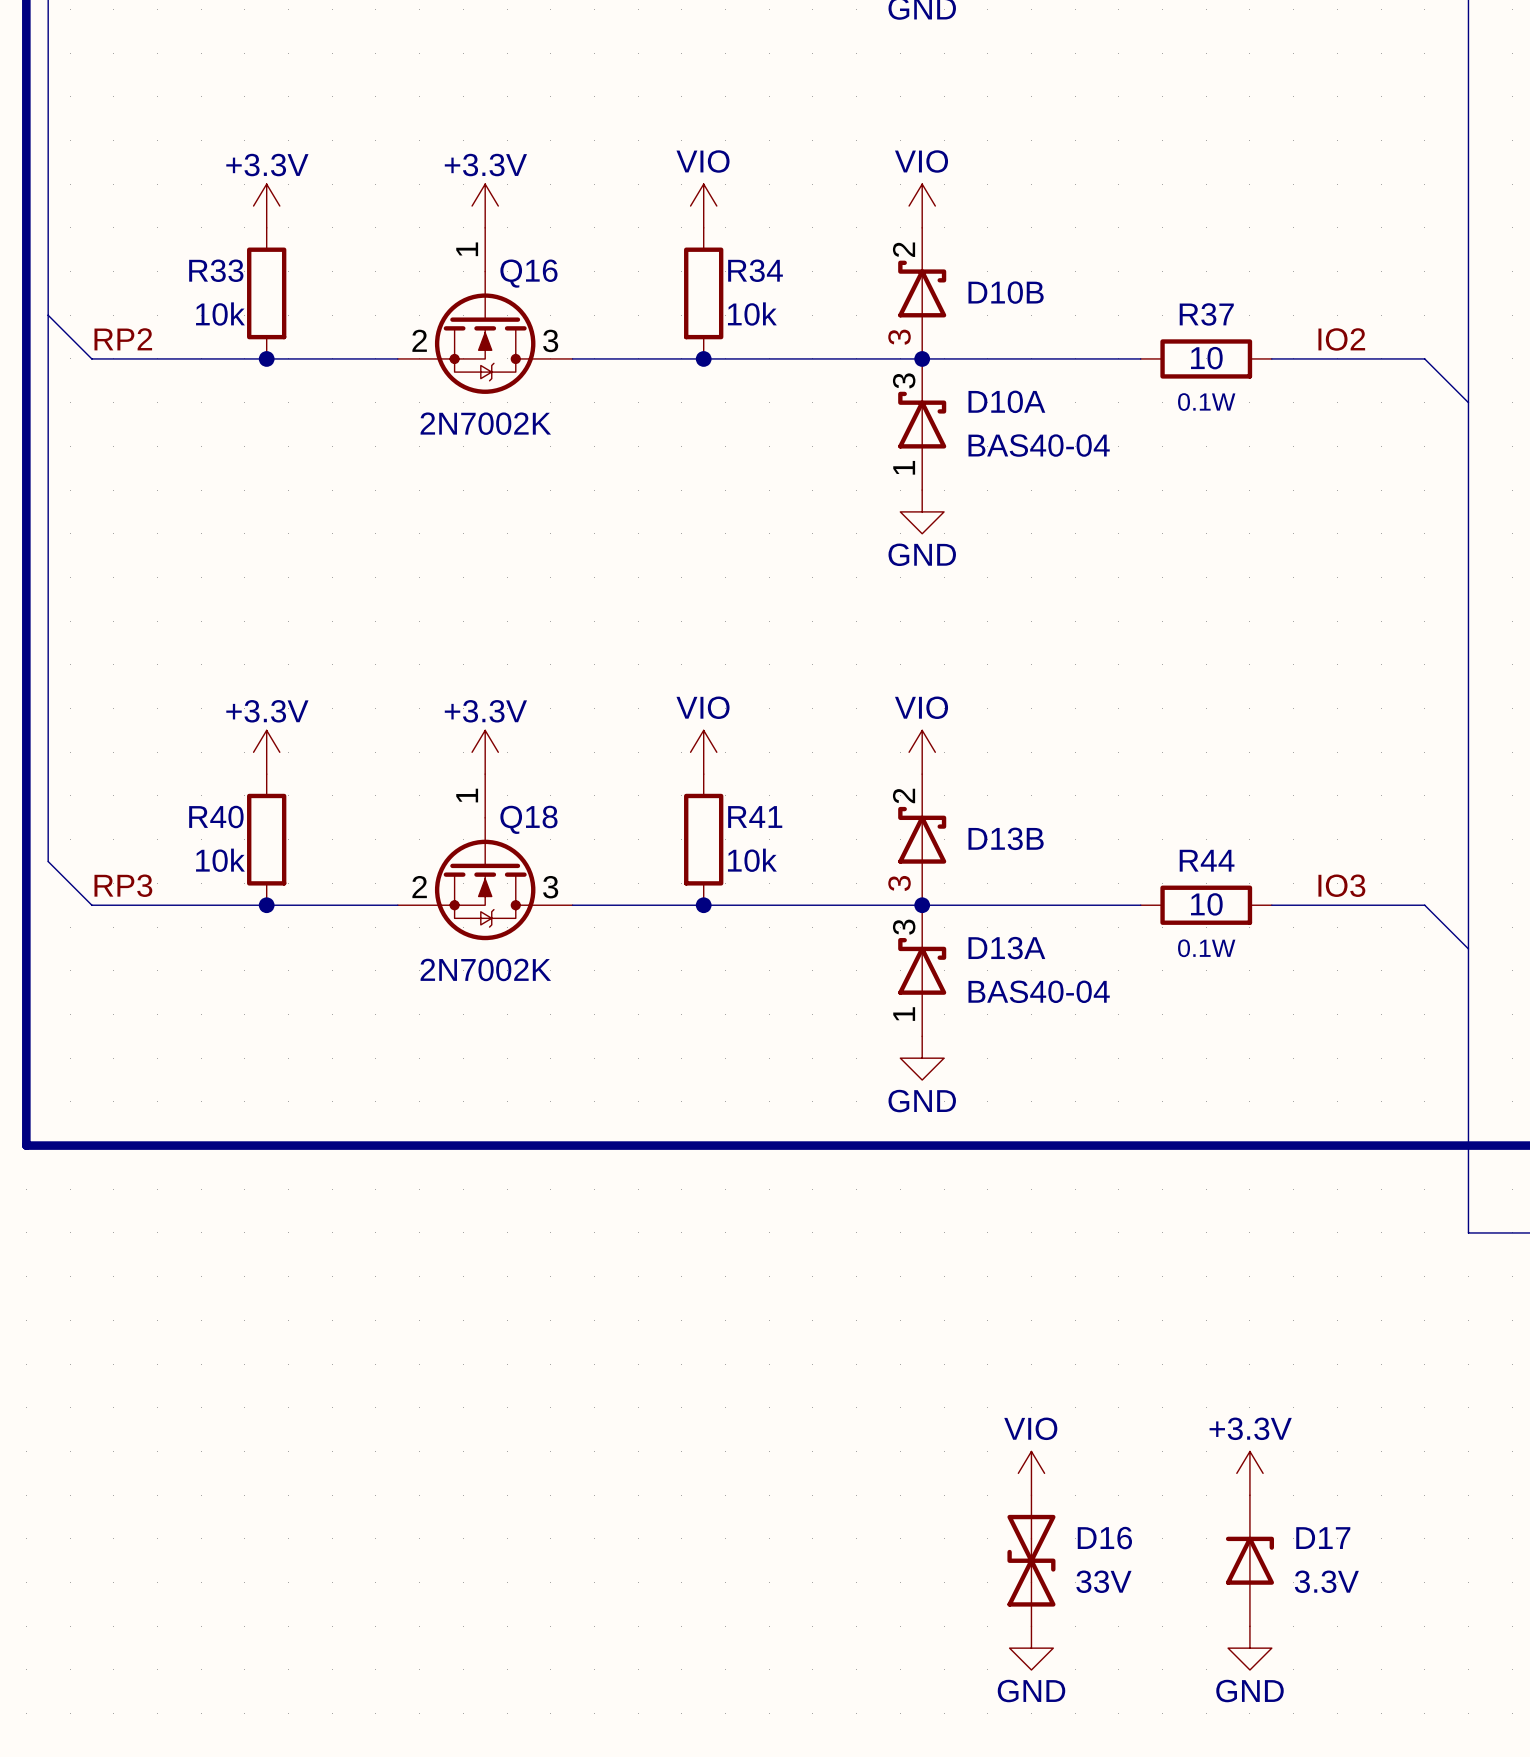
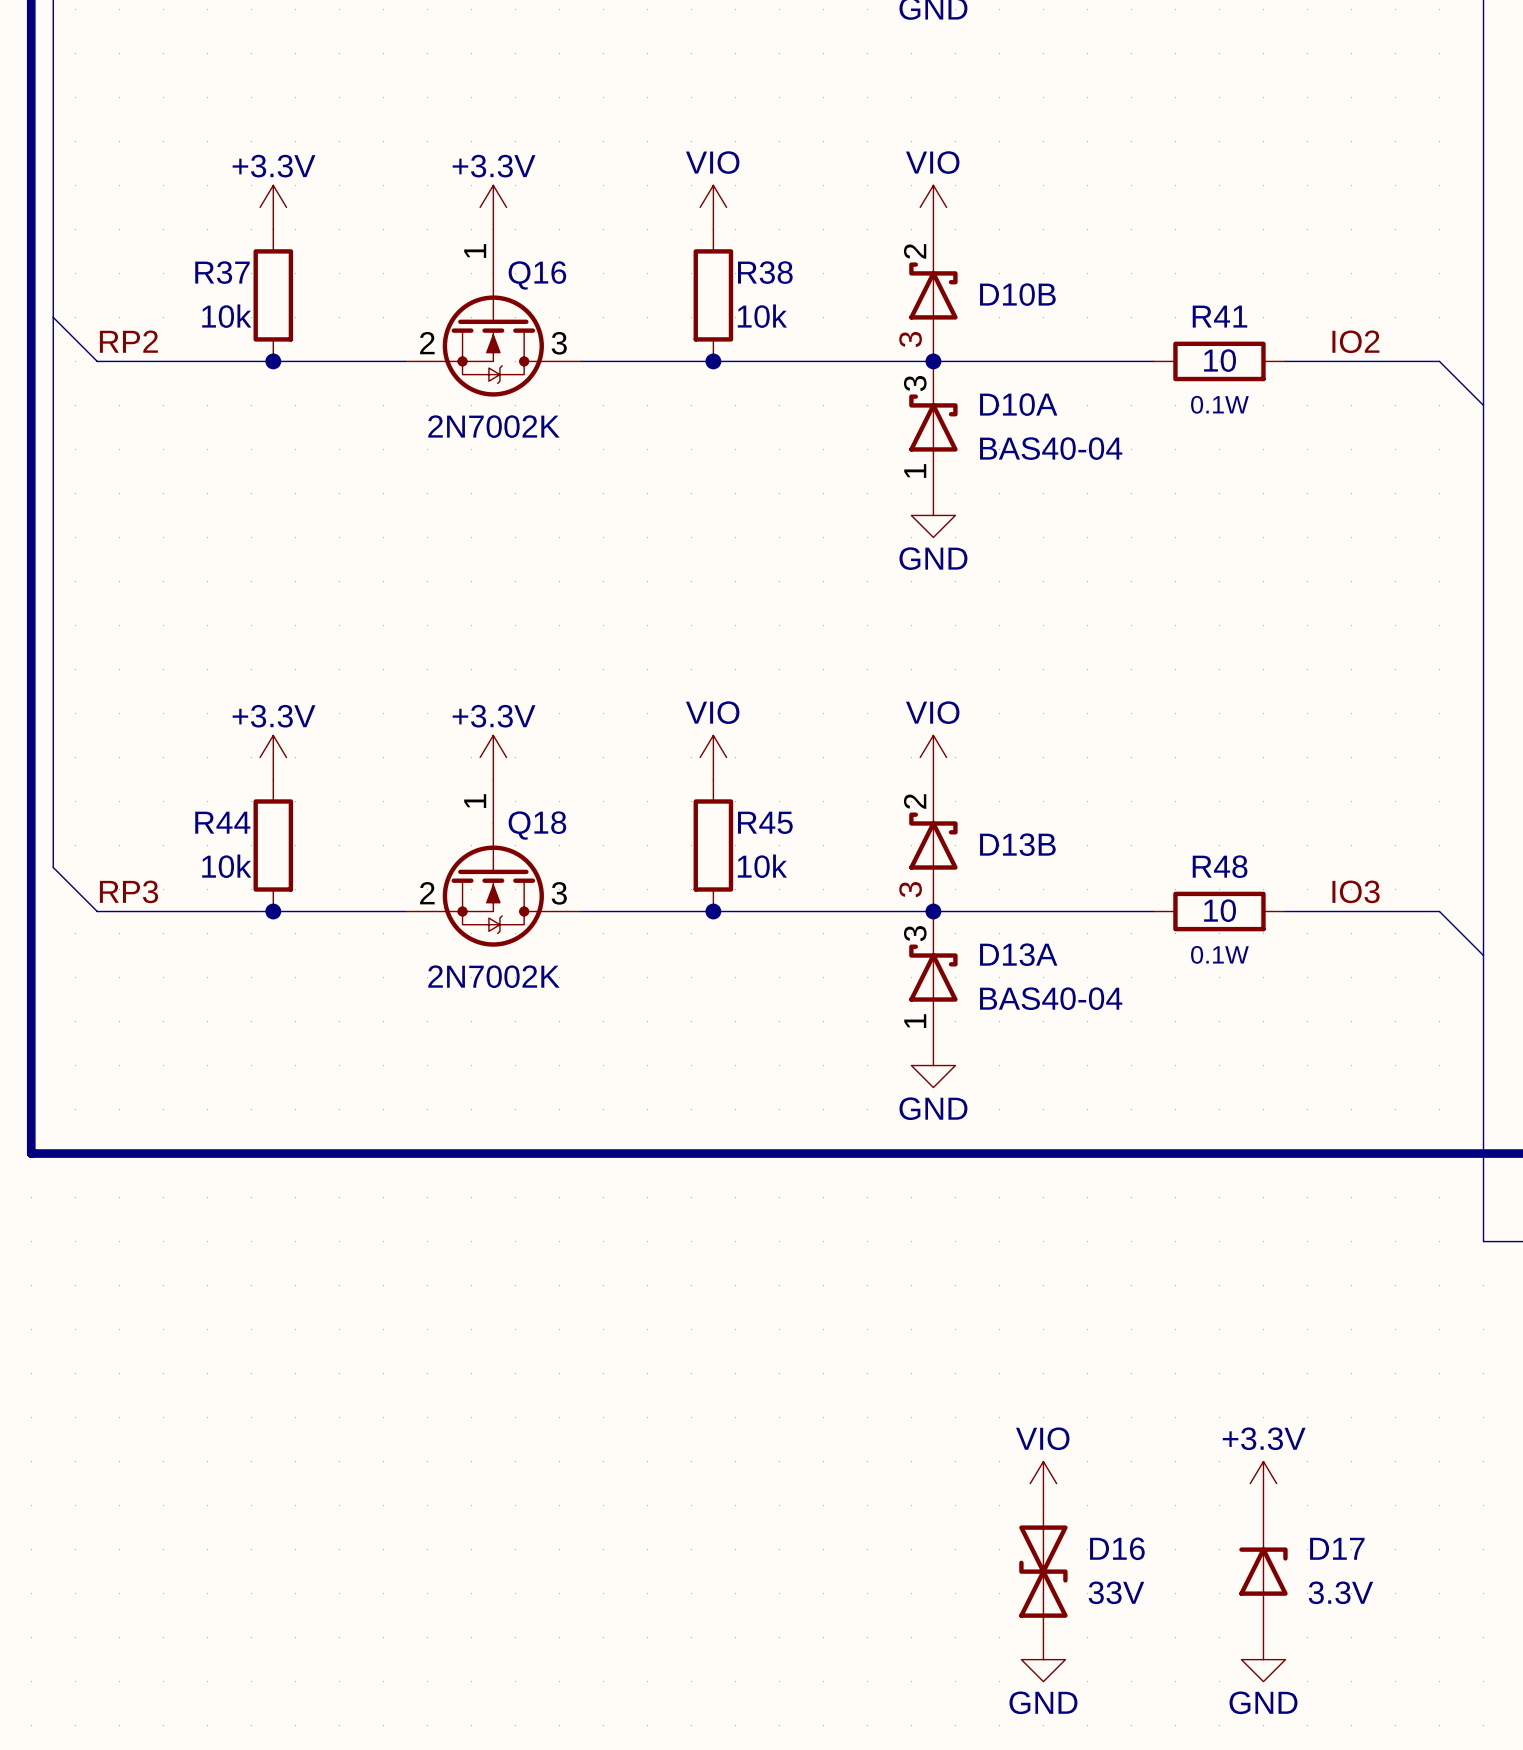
R33 name: R33 (216, 270) -> R37 (222, 272)
R34 name: R34 (755, 270) -> R38 (765, 272)
R37 name: R37 (1206, 314) -> R41 (1219, 316)
R40 name: R40 (216, 817) -> R44 (222, 822)
R41 name: R41 (755, 817) -> R45 (765, 822)
R44 name: R44 (1207, 860) -> R48 (1220, 866)

